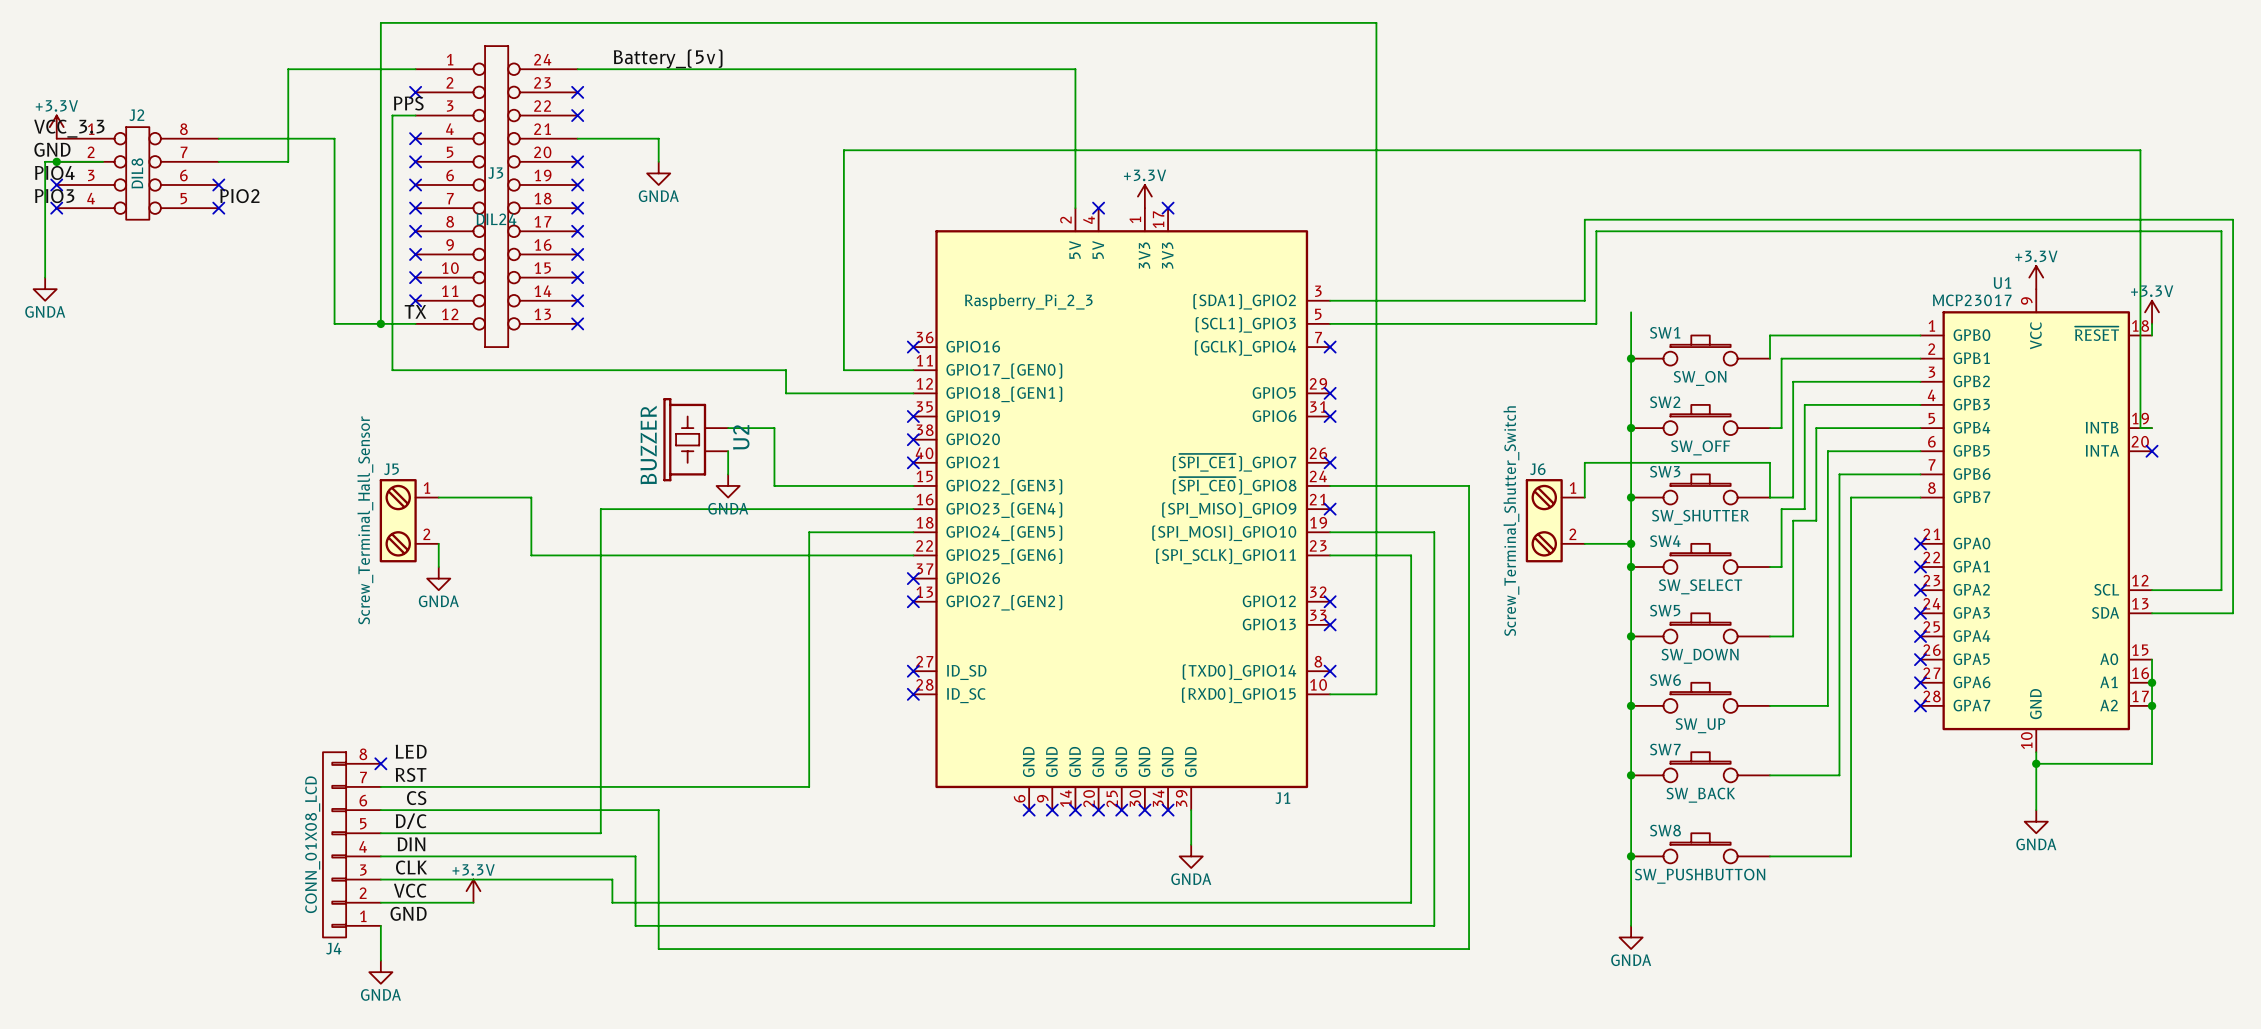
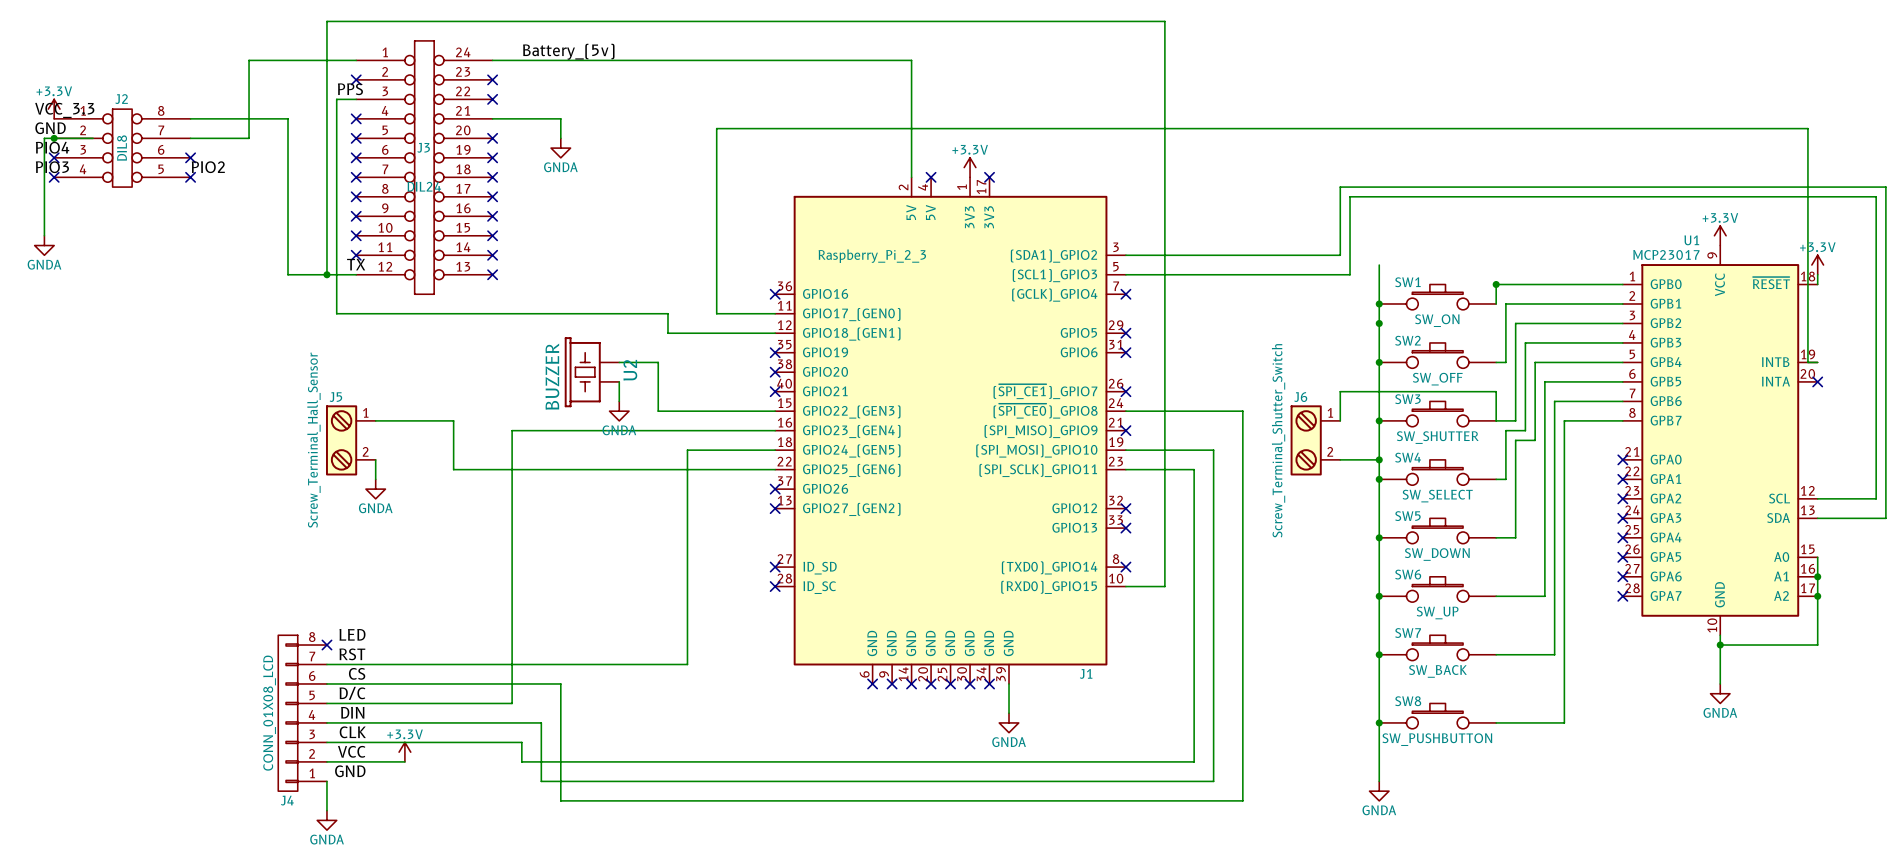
junction: none -> (1496, 284)
junction: none -> (1379, 323)

